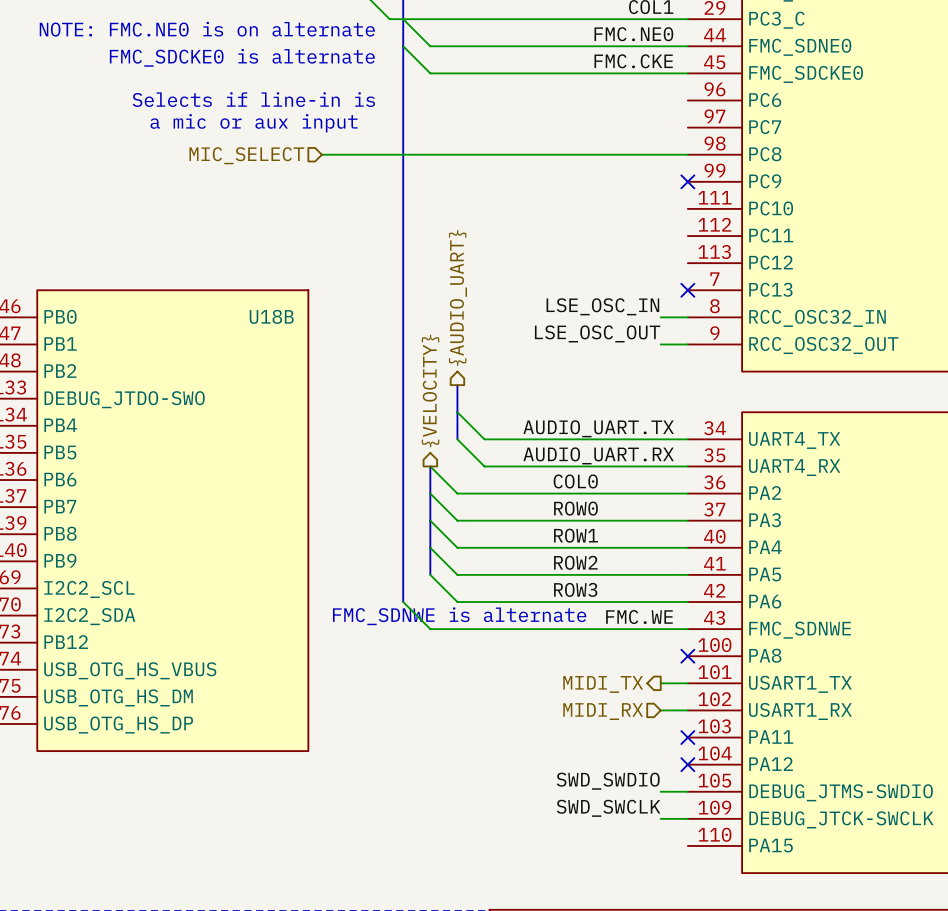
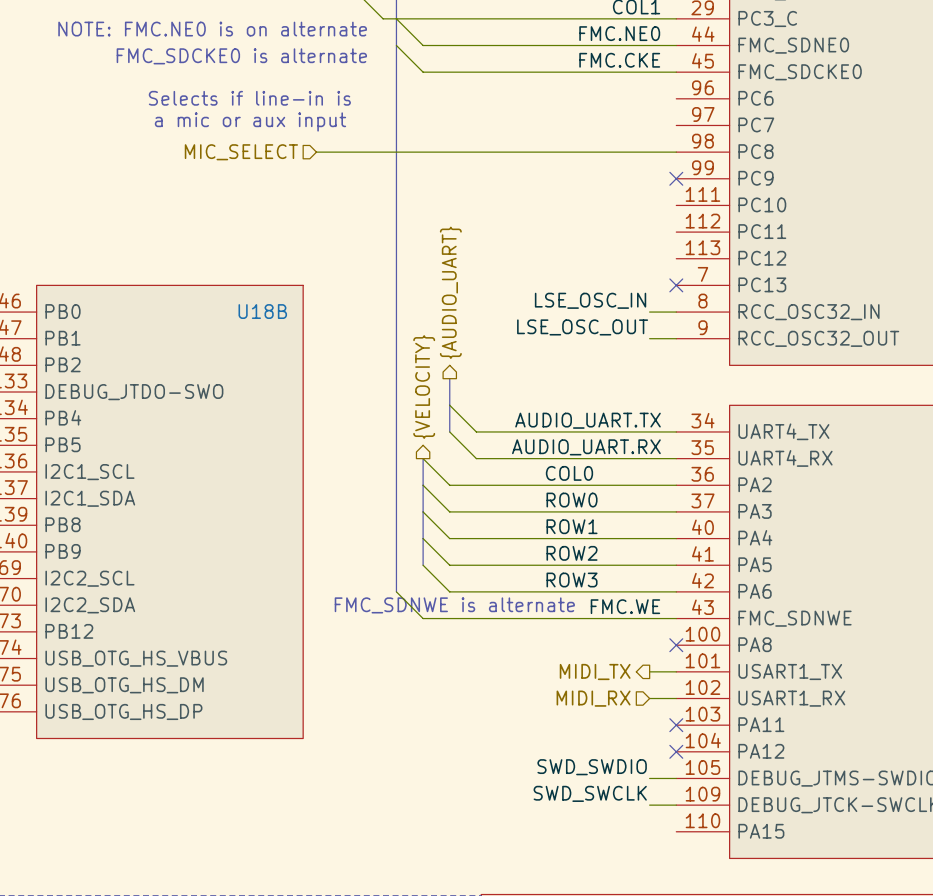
U18B pin name: PB6 (60, 479) -> I2C1_SCL (89, 472)
U18B pin name: PB7 (60, 506) -> I2C1_SDA (90, 498)

